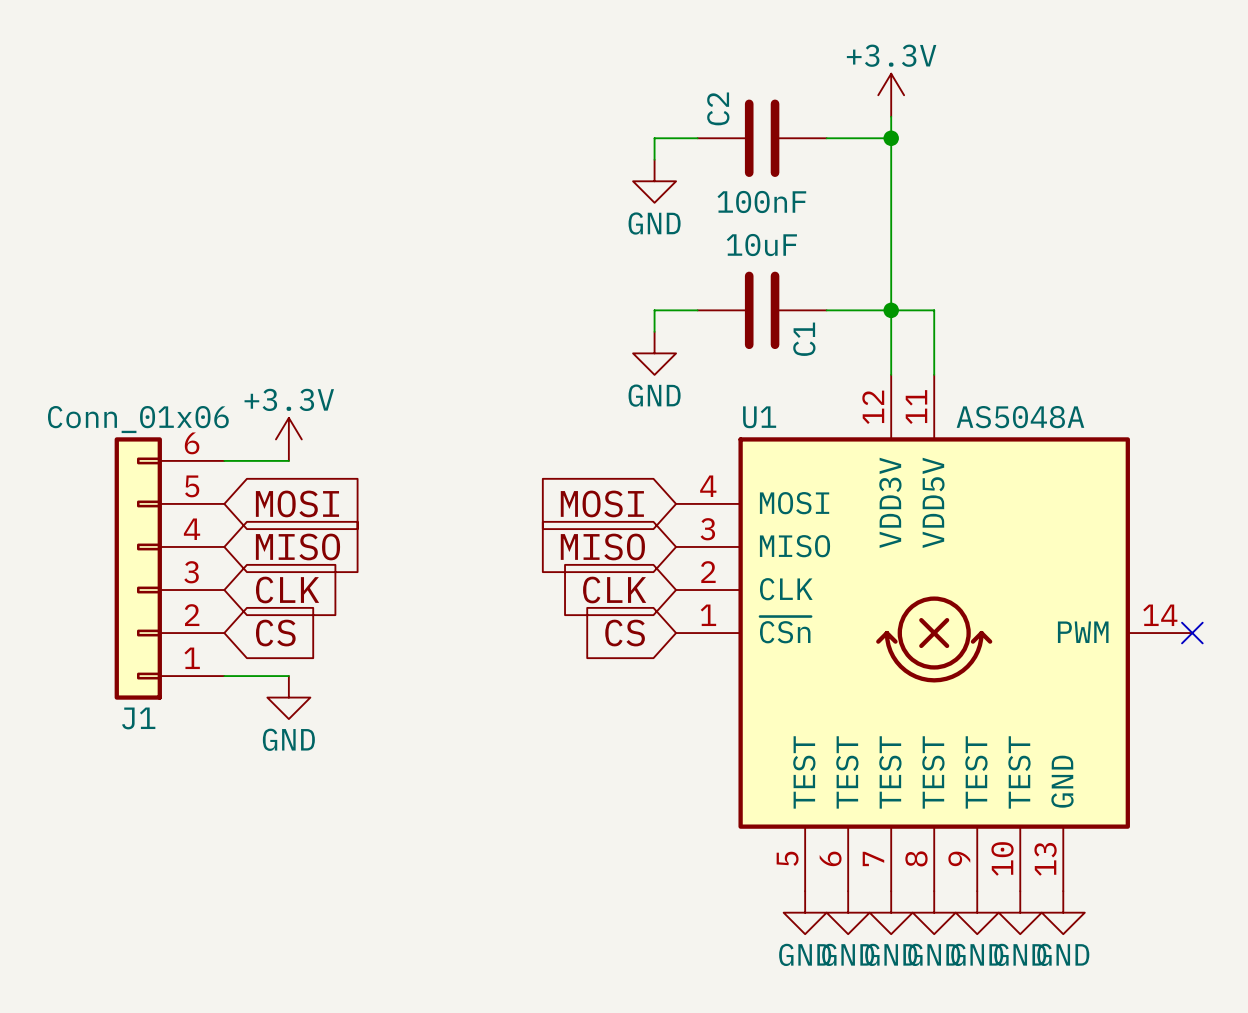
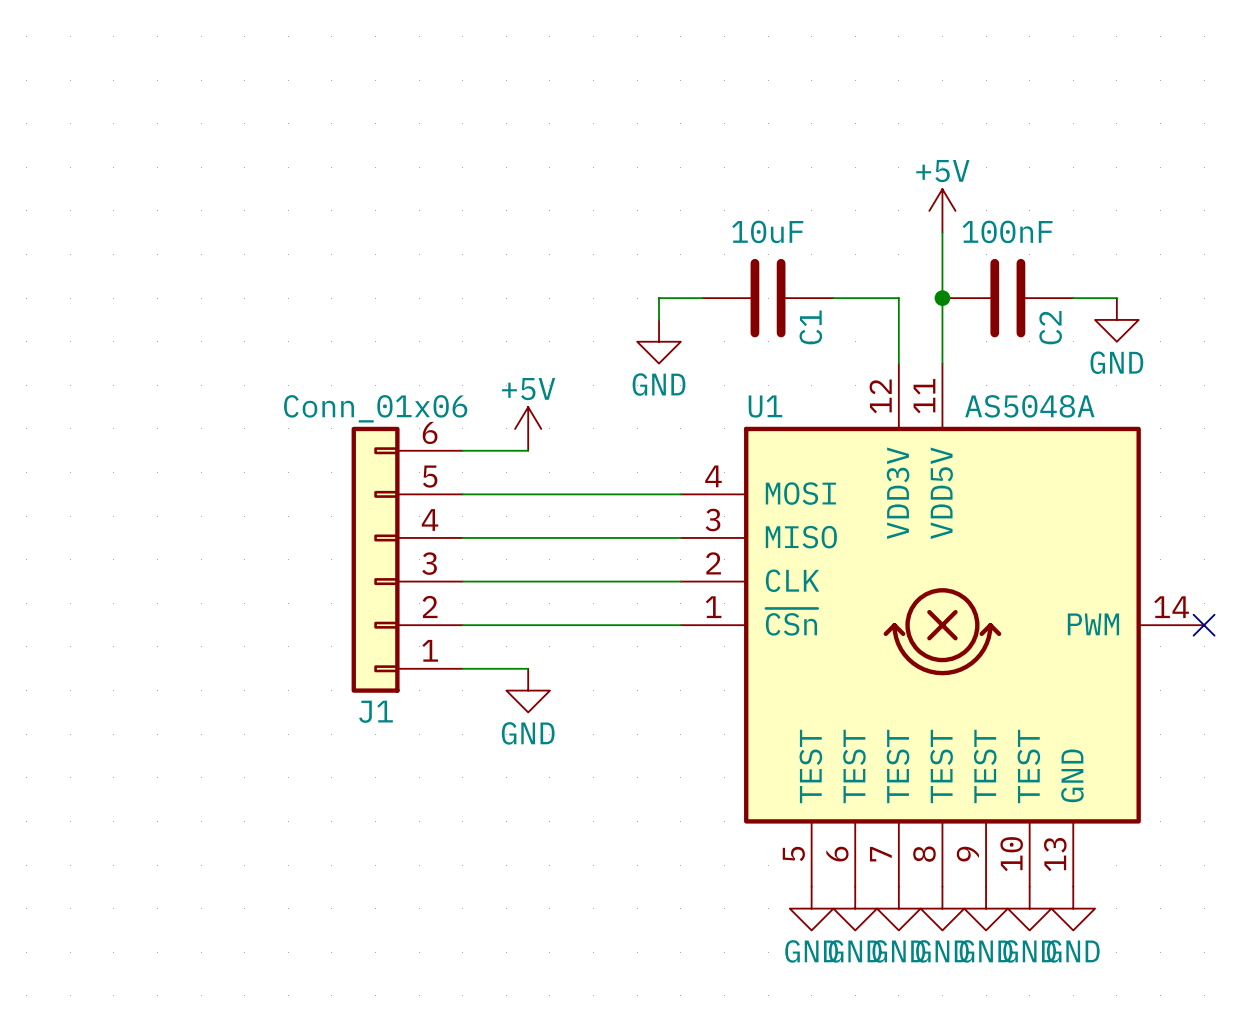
power symbol: +3.3V (891, 95) -> none
C2 name position: C2 (718, 108) -> C2 (1050, 327)
wire: (891, 116) (891, 310) (934, 310) -> (942, 232) (942, 298)
wire: (697, 138) (654, 138) (654, 159) -> none
C2 position: (762, 138) -> (1007, 298)
wire: (826, 138) (891, 138) -> none
junction: (891, 138) -> none
power symbol: GND (654, 181) -> none
C2 value position: 100nF (761, 201) -> 100nF (1007, 231)
power symbol: none -> +5V (942, 210)
junction position: (891, 310) -> (942, 298)
wire: none -> (1073, 298) (1116, 298)
power symbol: none -> GND (1116, 319)
power symbol: +3.3V (288, 439) -> none
power symbol: none -> +5V (528, 428)
wire: (224, 460) (288, 460) -> (462, 450) (528, 450)
global label: MOSI (297, 503) -> none
wire: none -> (462, 494) (680, 494)
global label: MOSI (602, 503) -> none
global label: MISO (297, 546) -> none
wire: none -> (462, 537) (680, 537)
global label: MISO (602, 546) -> none
J1 position: (169, 568) -> (407, 559)
global label: CLK (287, 590) -> none
wire: none -> (462, 581) (680, 581)
global label: CLK (614, 590) -> none
global label: CS (275, 633) -> none
wire: none -> (462, 625) (680, 625)
global label: CS (625, 633) -> none
wire: (224, 676) (288, 676) -> (462, 668) (528, 668)
power symbol position: GND (288, 697) -> GND (528, 690)

